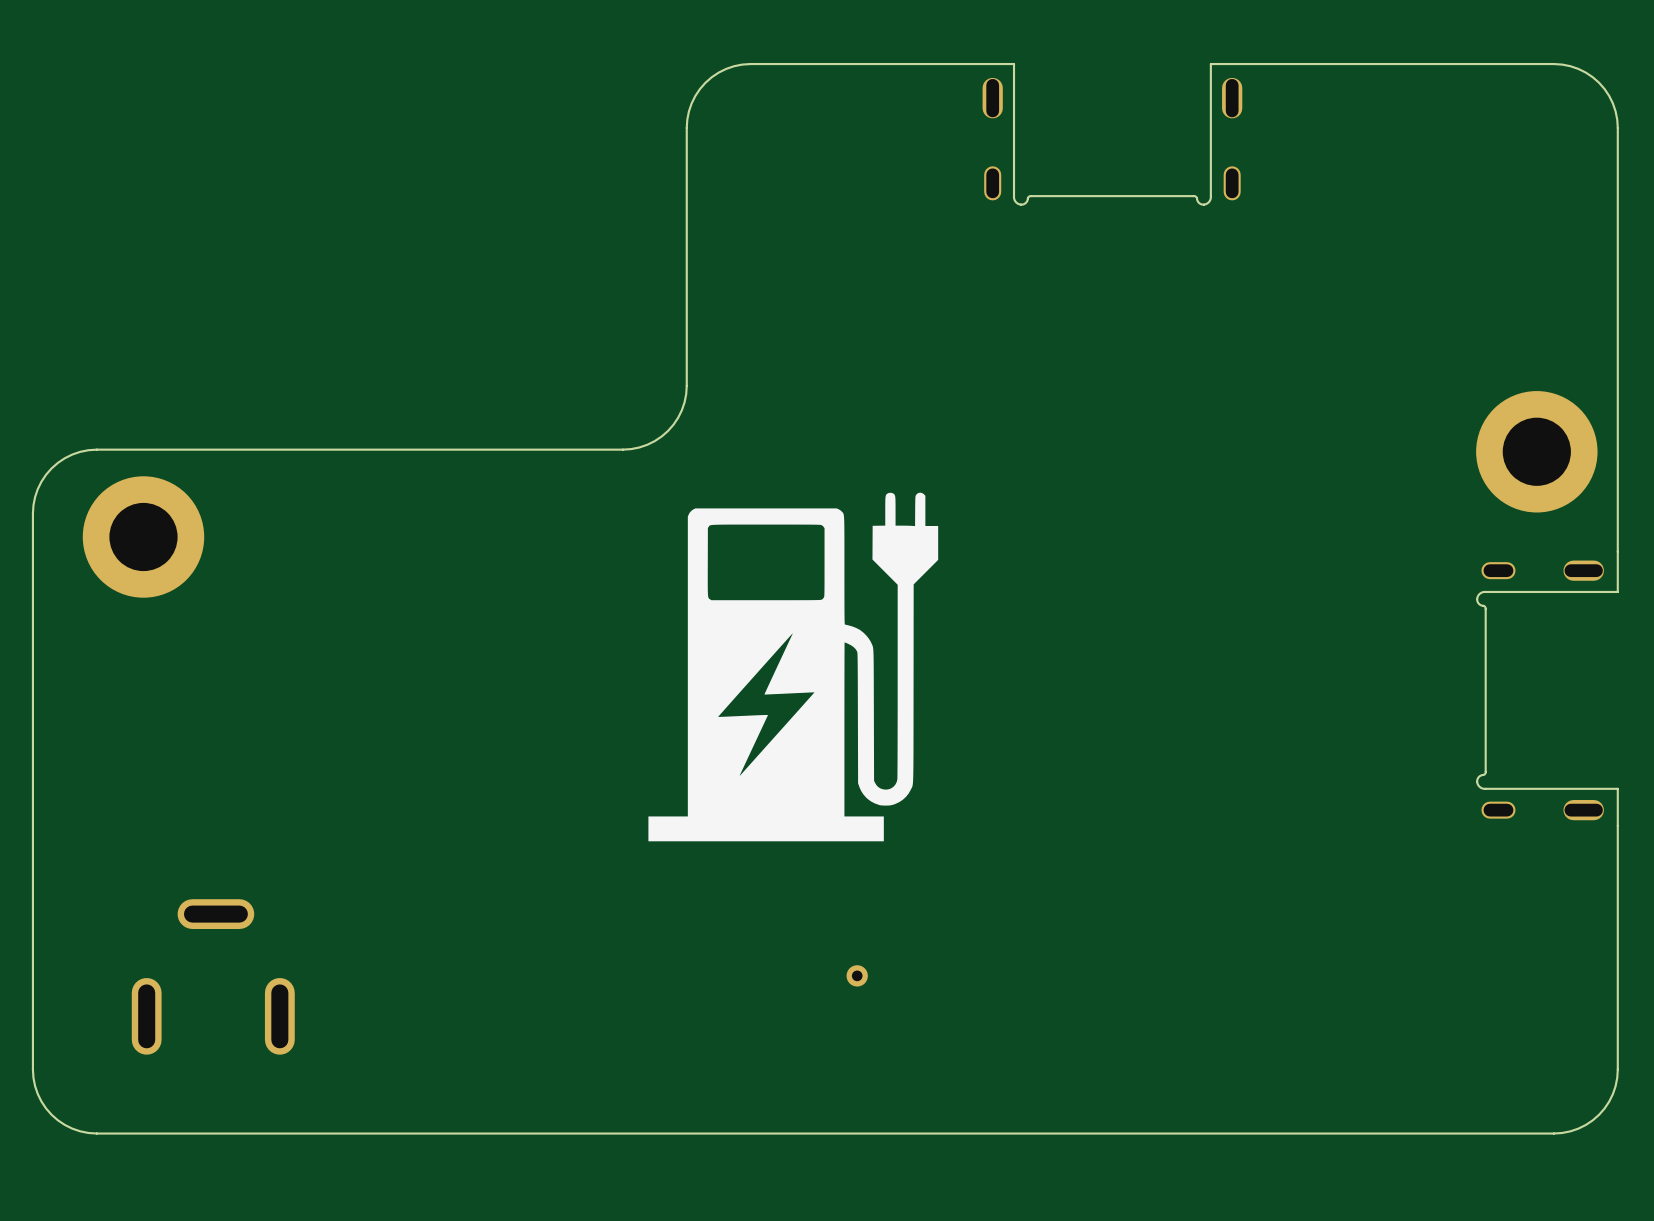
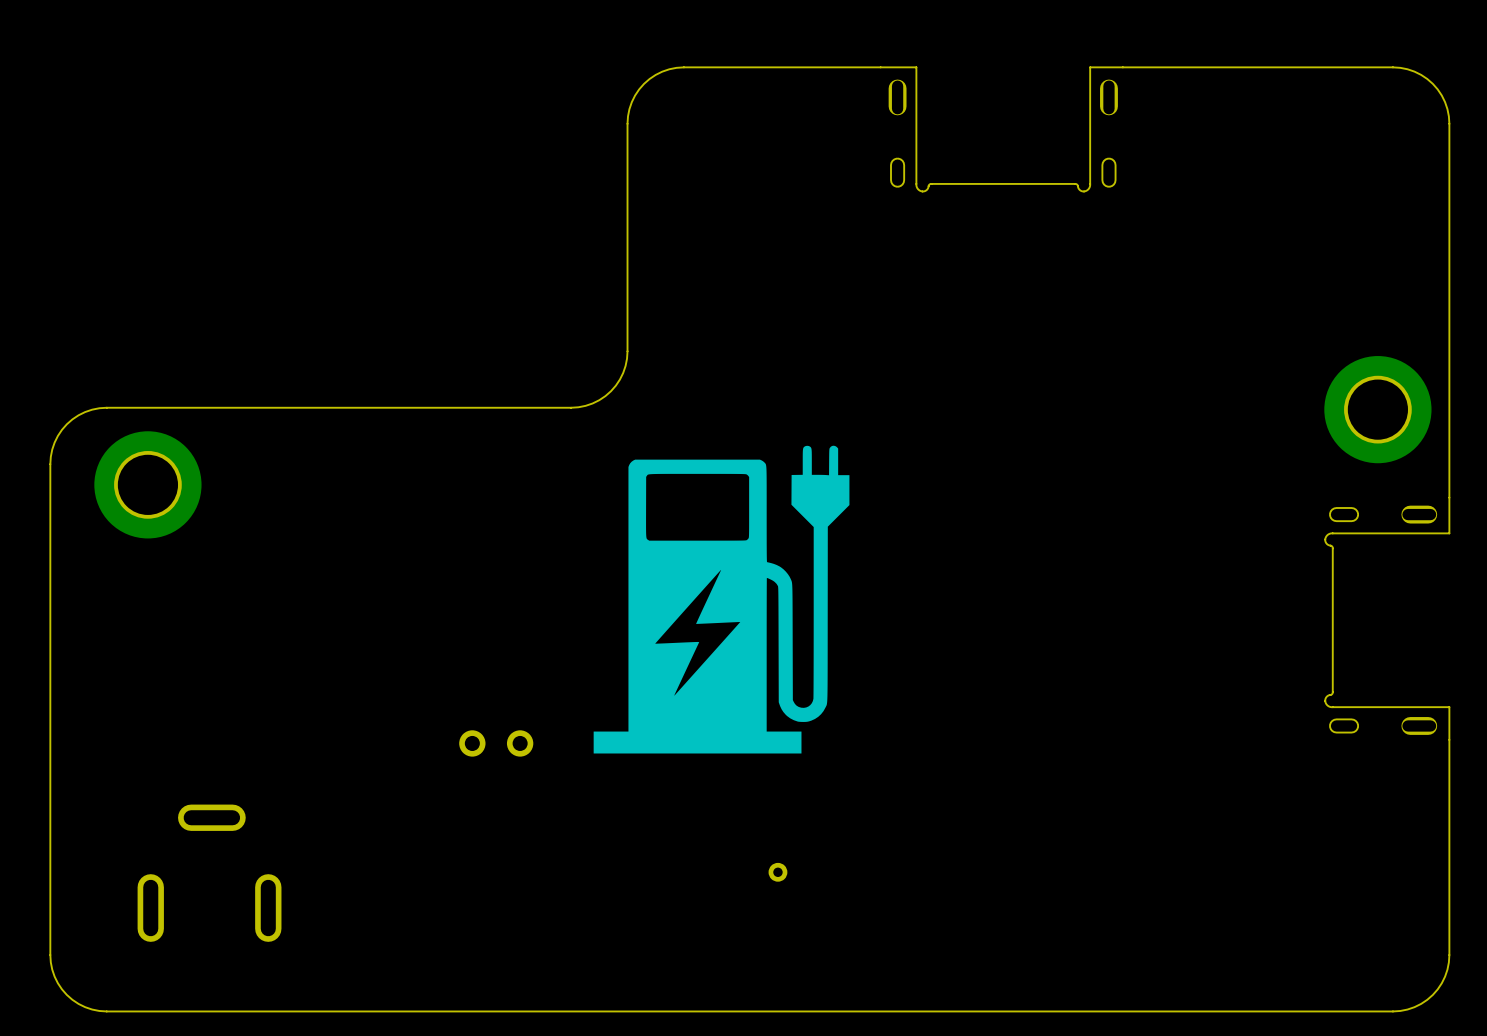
part: none -> (496, 743)

